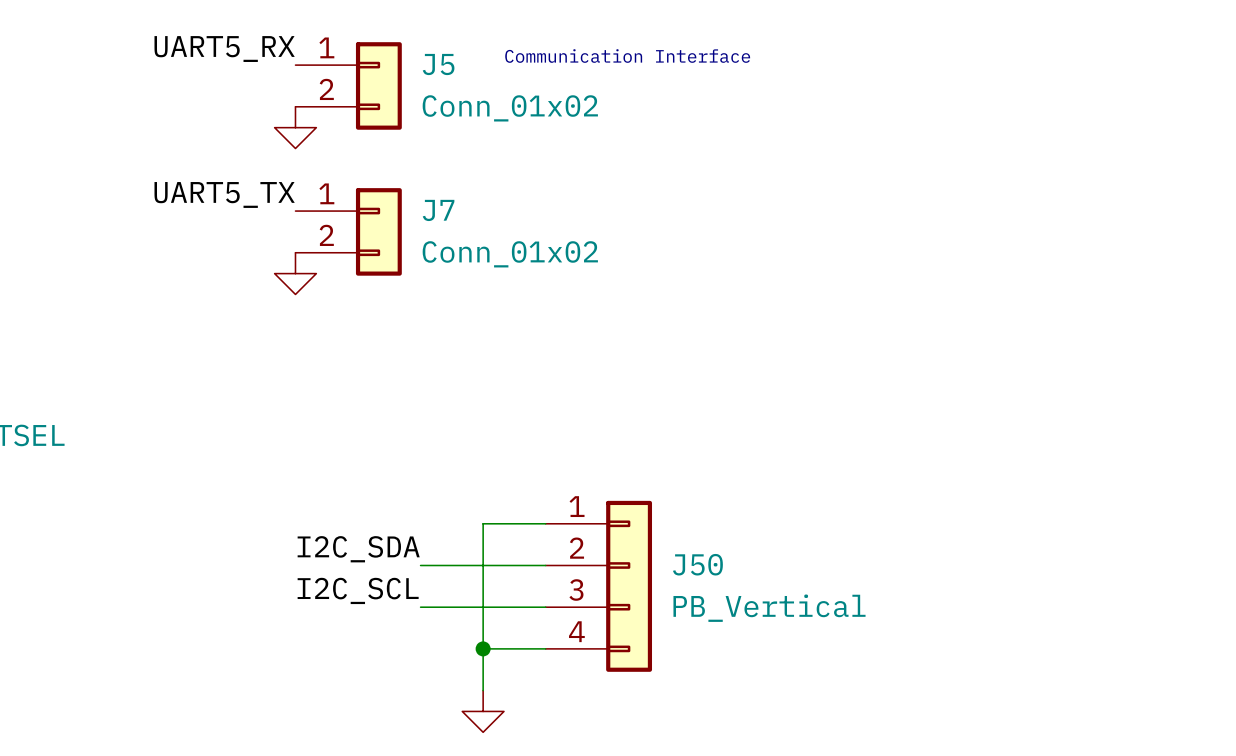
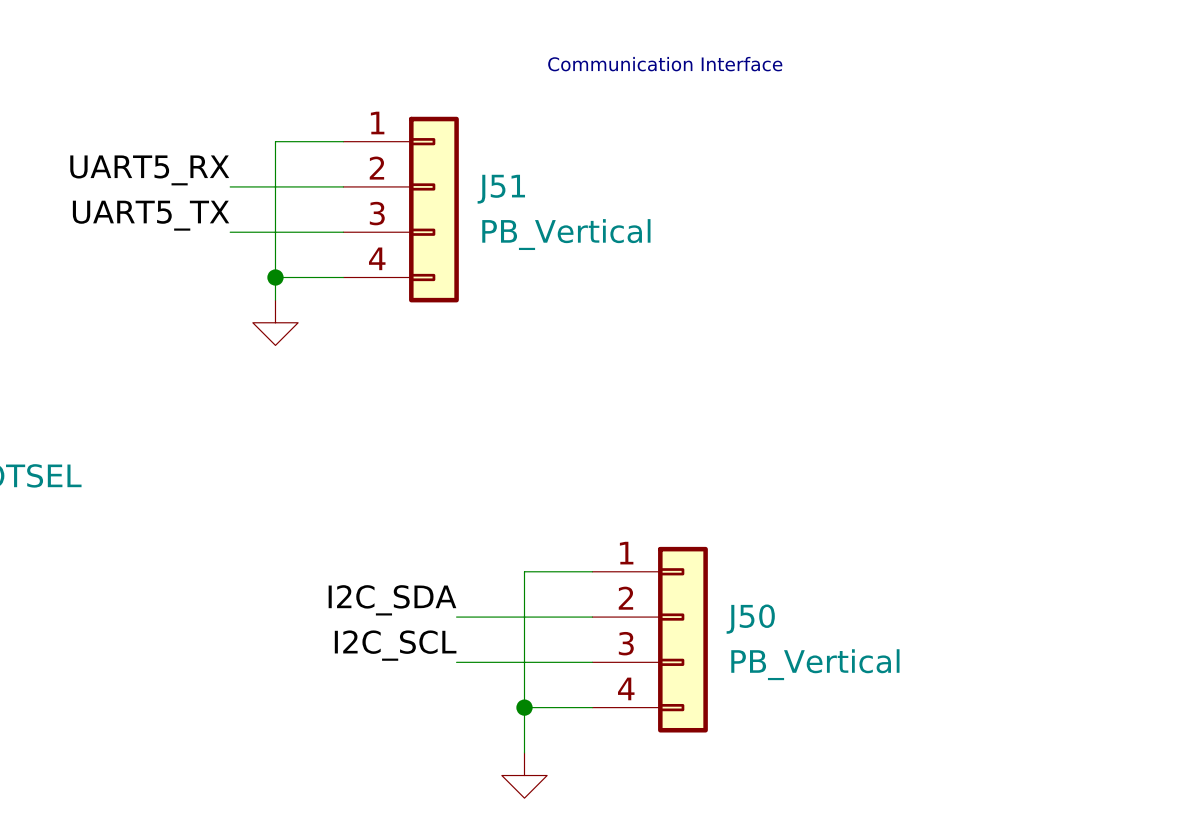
label position: UART5_RX (224, 49) -> UART5_RX (149, 170)
J5: Conn_01x02 (348, 85) -> none
power symbol: (295, 127) -> none
wire: none -> (343, 141) (275, 141) (275, 300)
wire: none -> (230, 186) (343, 186)
J51: none -> PB_Vertical (401, 209)
label position: UART5_TX (224, 194) -> UART5_TX (151, 215)
wire: none -> (230, 232) (343, 232)
J7: Conn_01x02 (348, 231) -> none
wire: none -> (275, 277) (343, 277)
junction: none -> (275, 277)
power symbol position: (295, 273) -> (275, 322)

